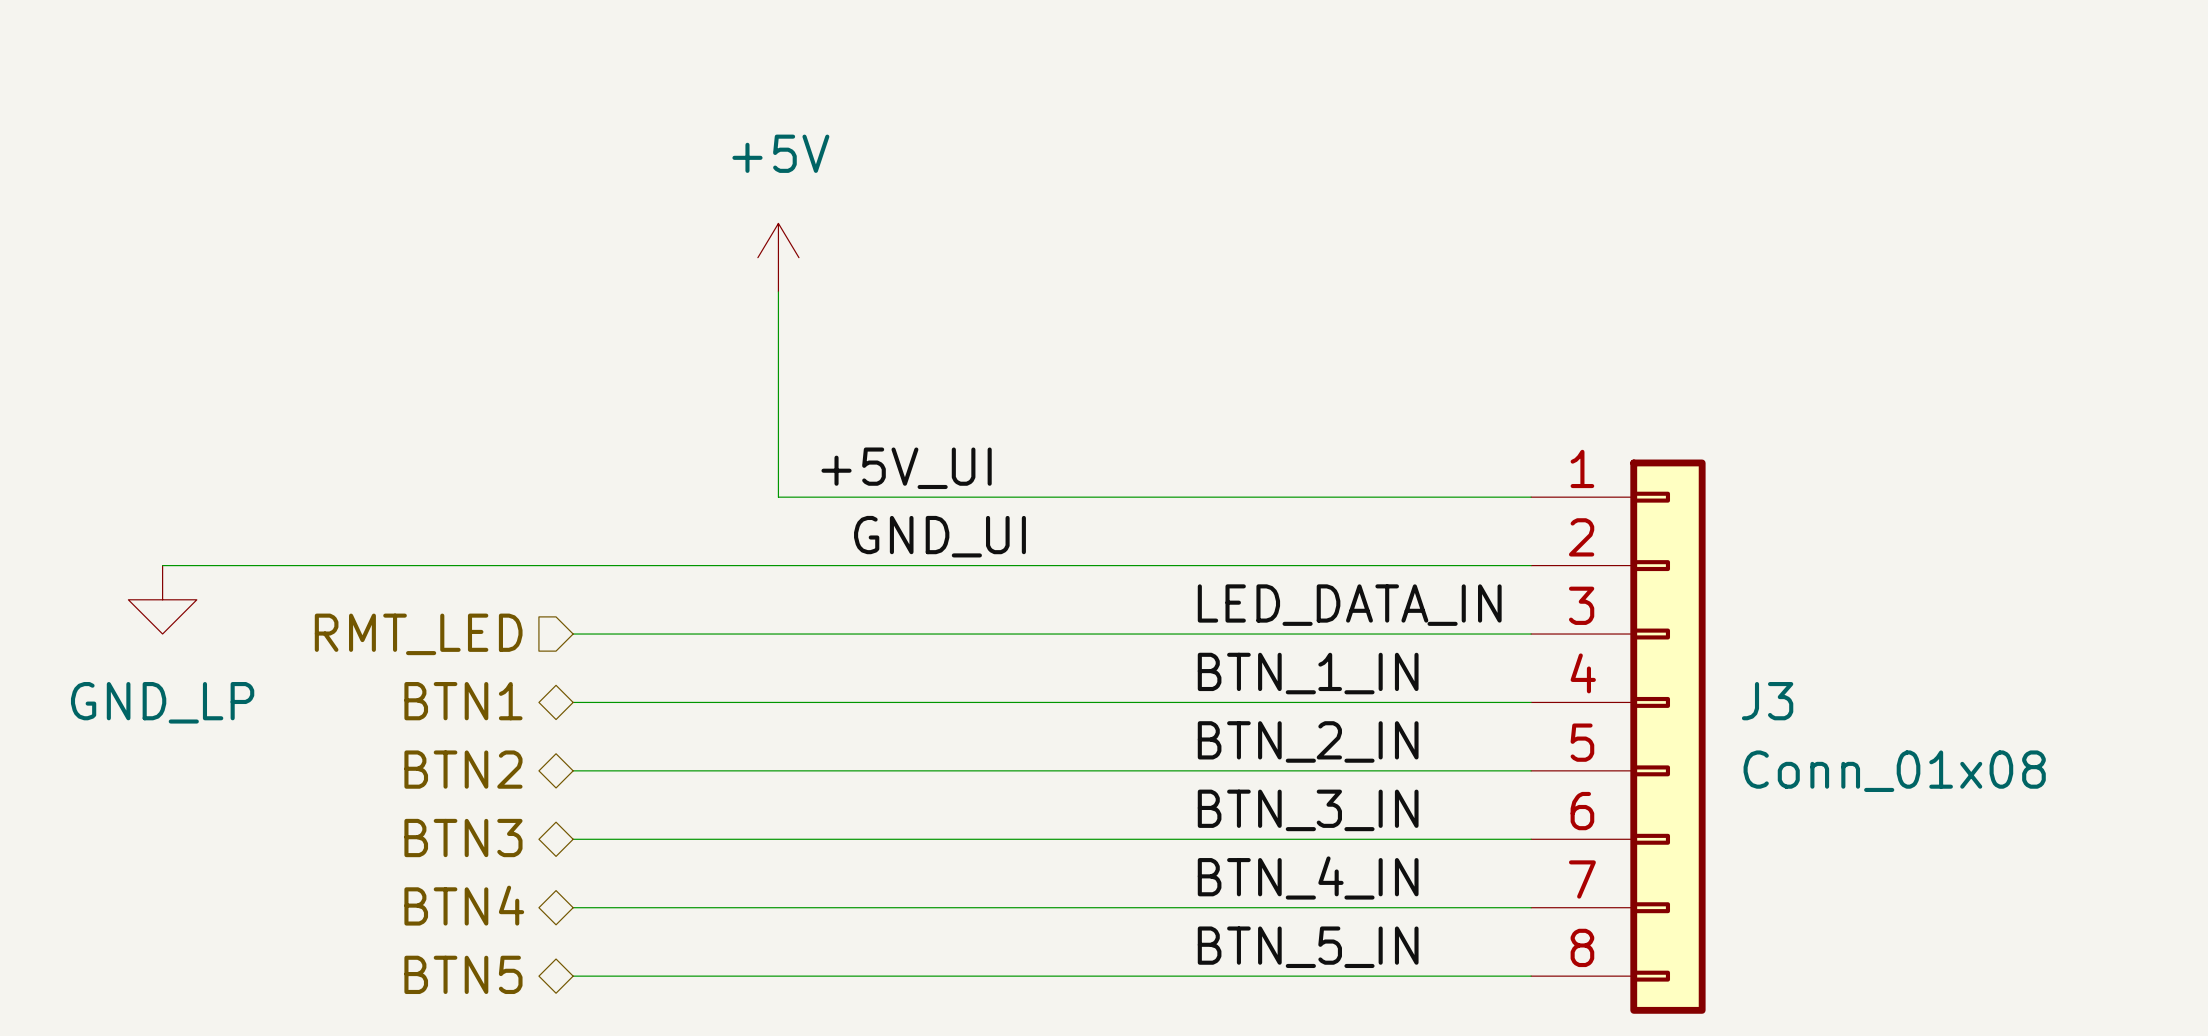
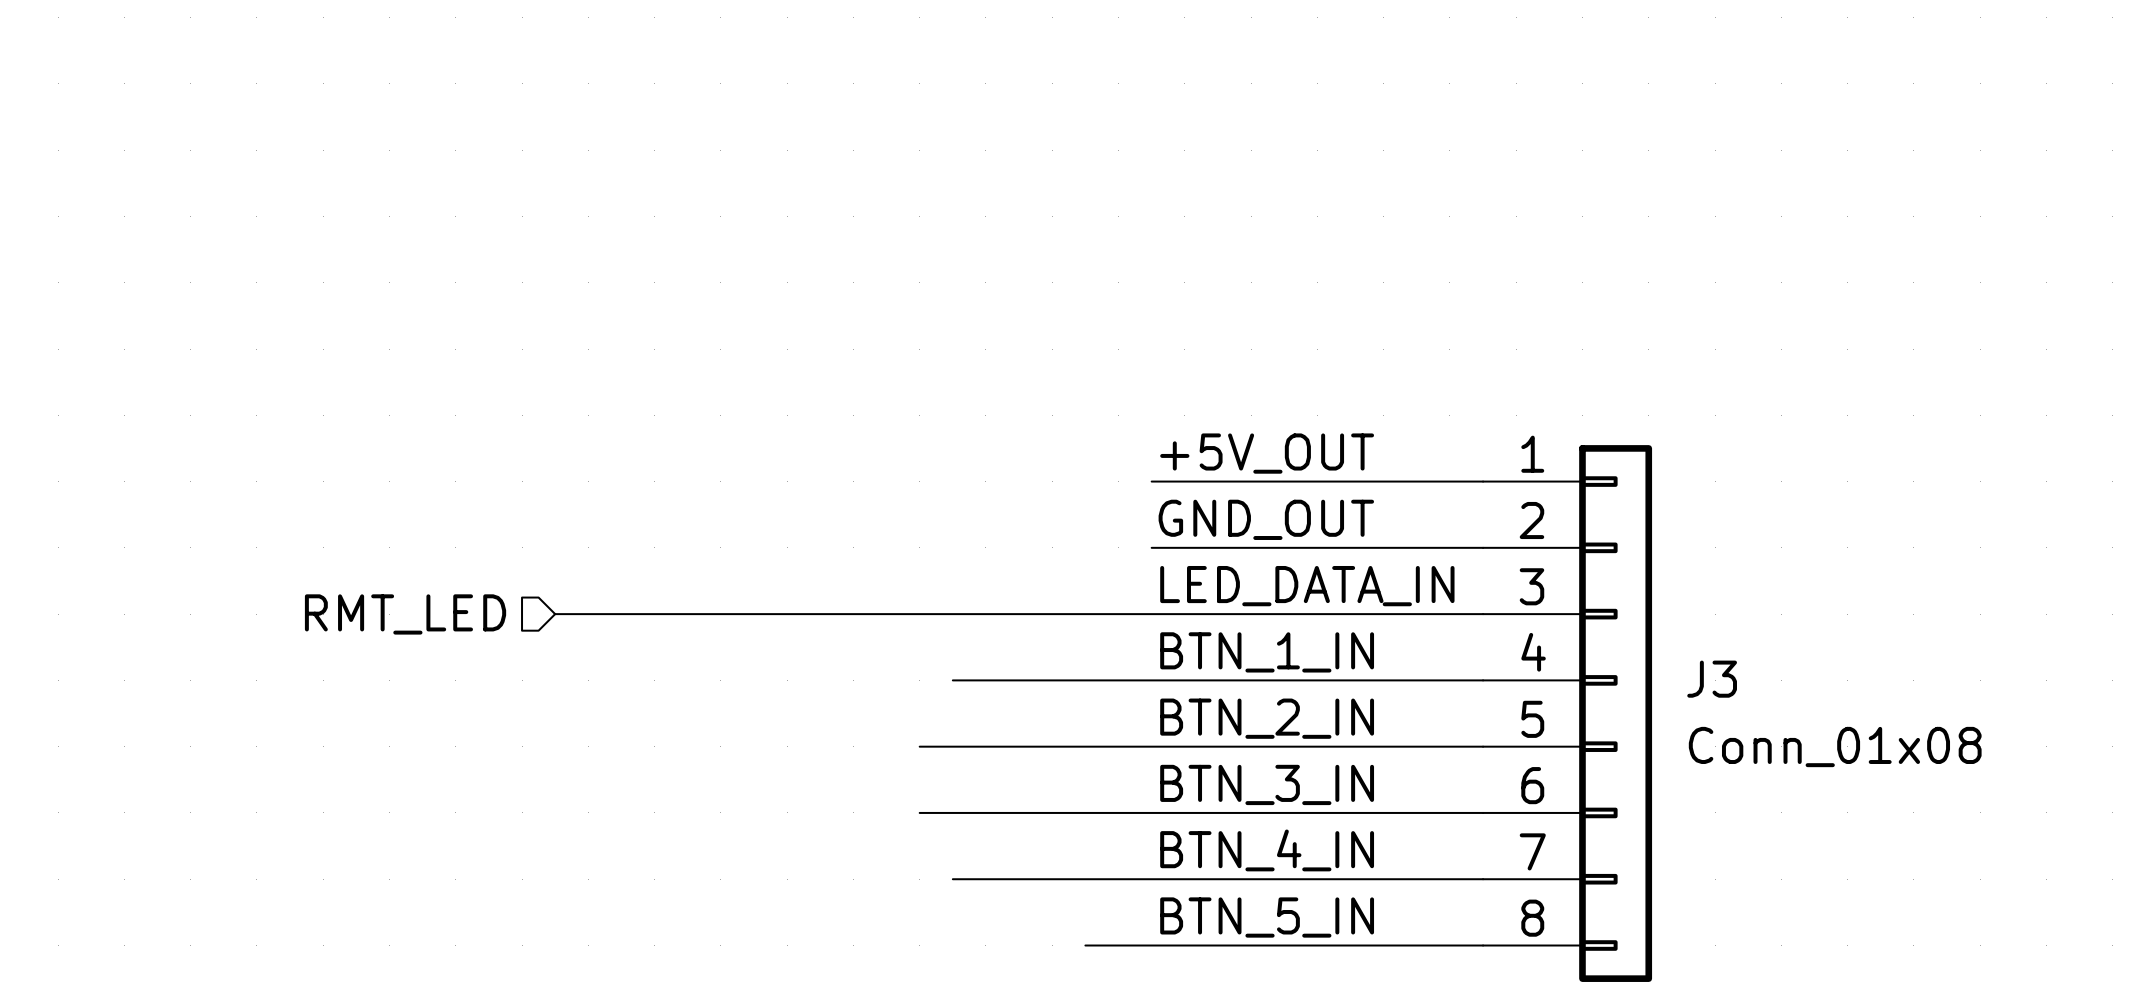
power symbol: +5V (778, 257) -> none
wire: (778, 291) (778, 497) (1188, 497) -> none
label: +5V_UI (906, 468) -> none
label: none -> +5V_OUT (1267, 453)
label: GND_UI (939, 536) -> none
label: none -> GND_OUT (1266, 519)
wire: (162, 565) (1188, 565) -> none
power symbol: GND_LP (162, 599) -> none
hierarchical label: BTN1 (463, 701) -> none
wire: (573, 702) (983, 702) -> none
hierarchical label: BTN2 (463, 769) -> none
wire: (573, 770) (949, 770) -> none
hierarchical label: BTN3 (463, 838) -> none
wire: (573, 839) (949, 839) -> none
hierarchical label: BTN4 (464, 905) -> none
wire: (573, 907) (983, 907) -> none
hierarchical label: BTN5 (463, 974) -> none
wire: (573, 976) (1120, 976) -> none

